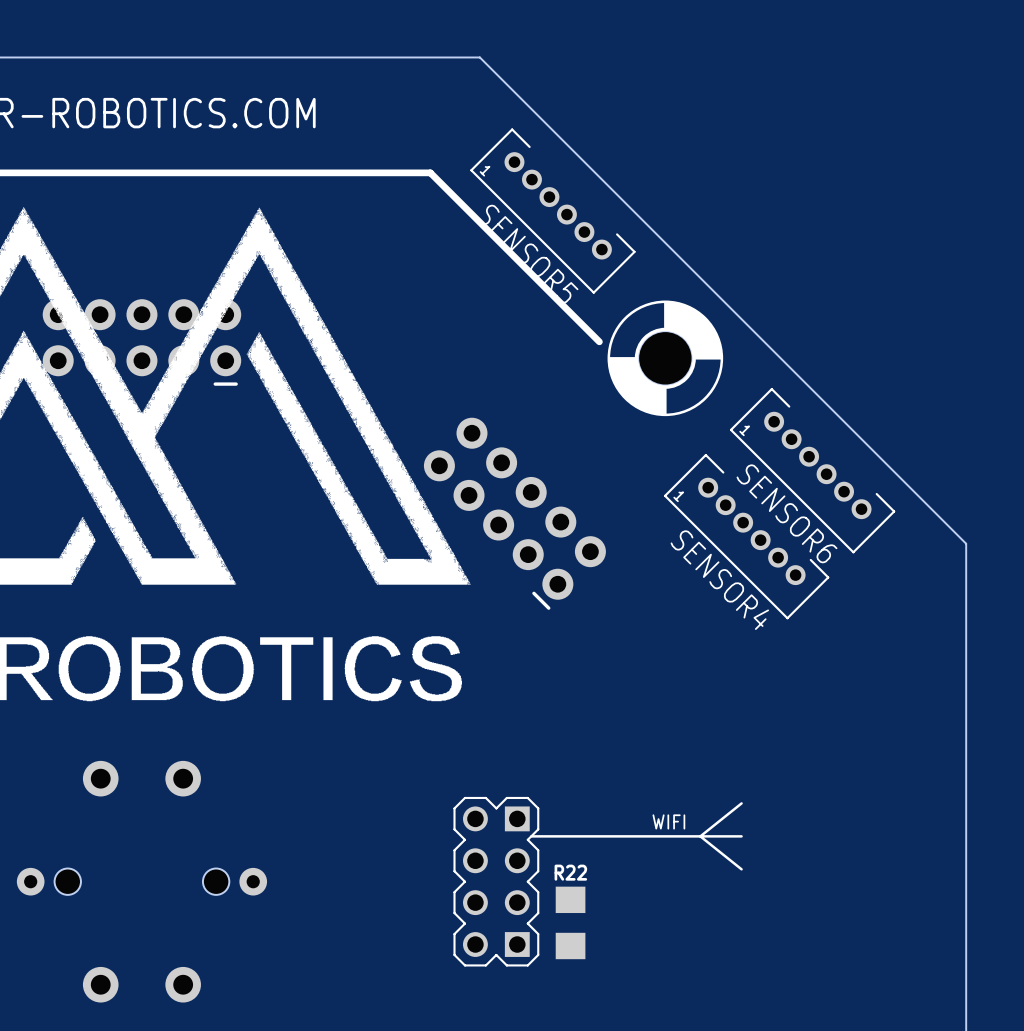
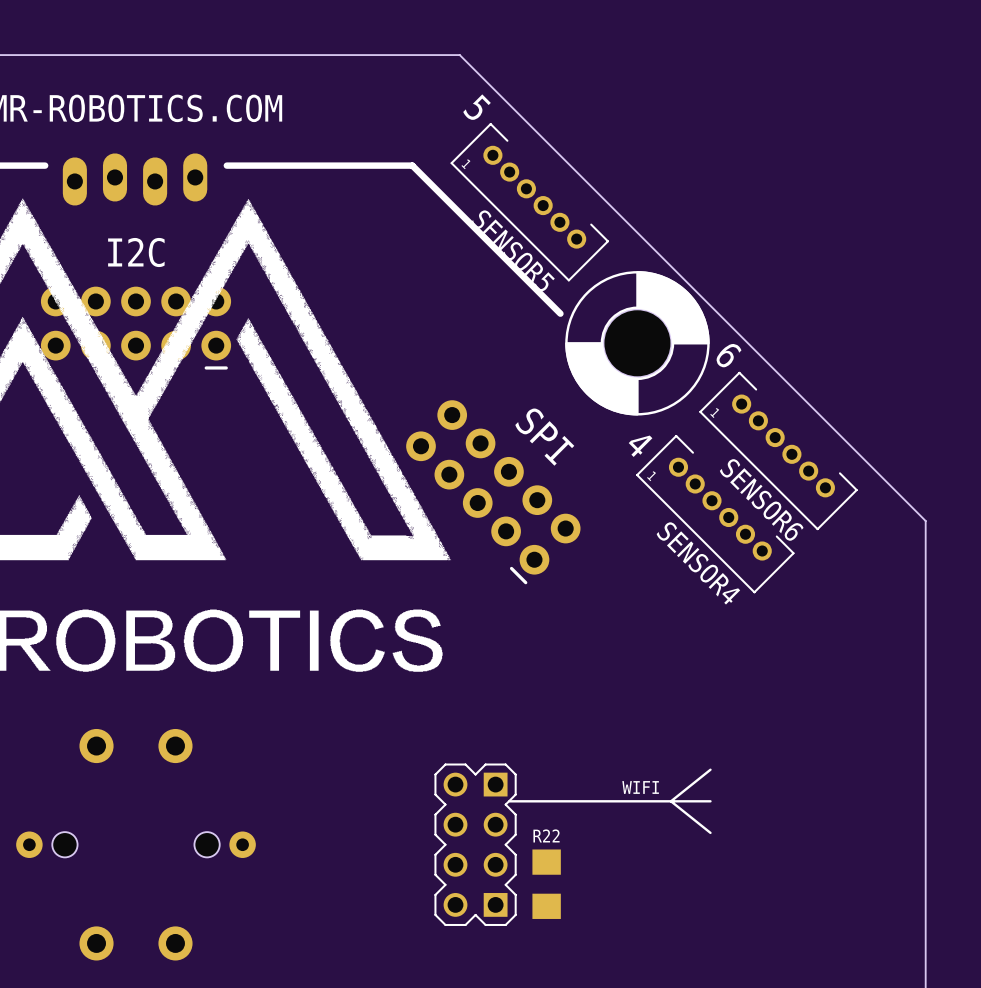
text: none -> 5 (477, 107)
line: (47, 172) (236, 172) -> none
part: none -> (135, 179)
text: none -> I2C (136, 252)
part footprint: [607, 300, 724, 417] -> [565, 271, 710, 416]
drawing shape: [664, 301, 723, 360] -> [636, 271, 710, 345]
line: (584, 327) (599, 341) -> none
drawing shape: [608, 357, 667, 416] -> [565, 342, 639, 416]
text: none -> 6 (728, 355)
text: none -> SPI (544, 437)
text: none -> 4 (640, 446)

